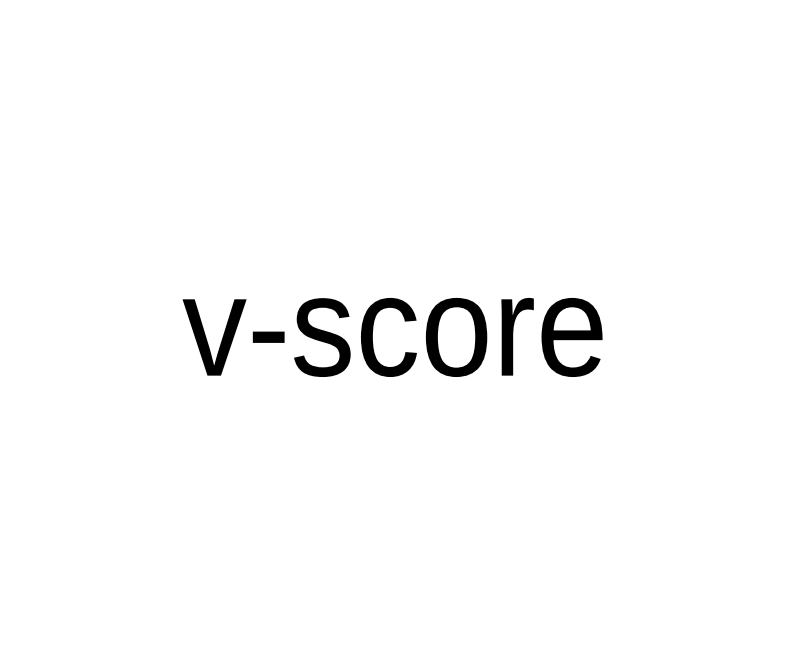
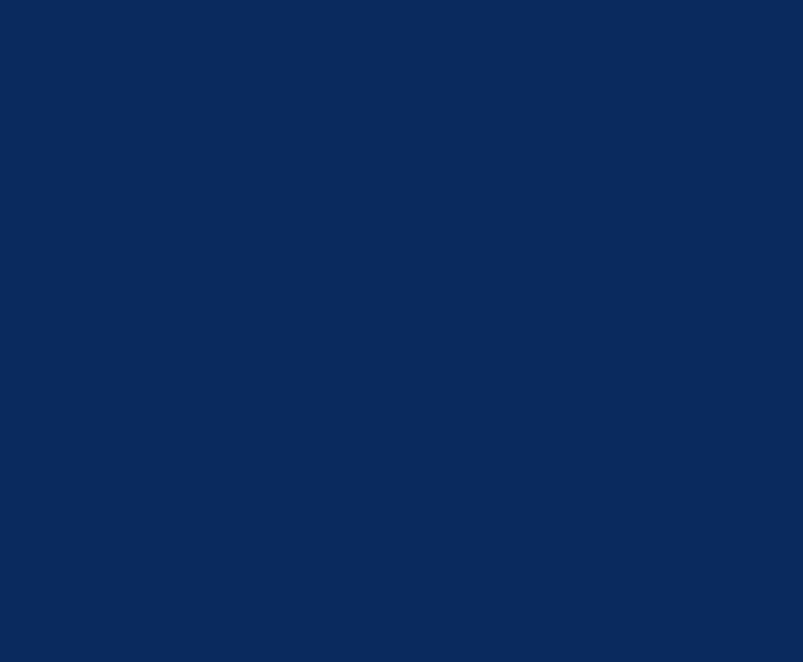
text: v-score (392, 337) -> none

